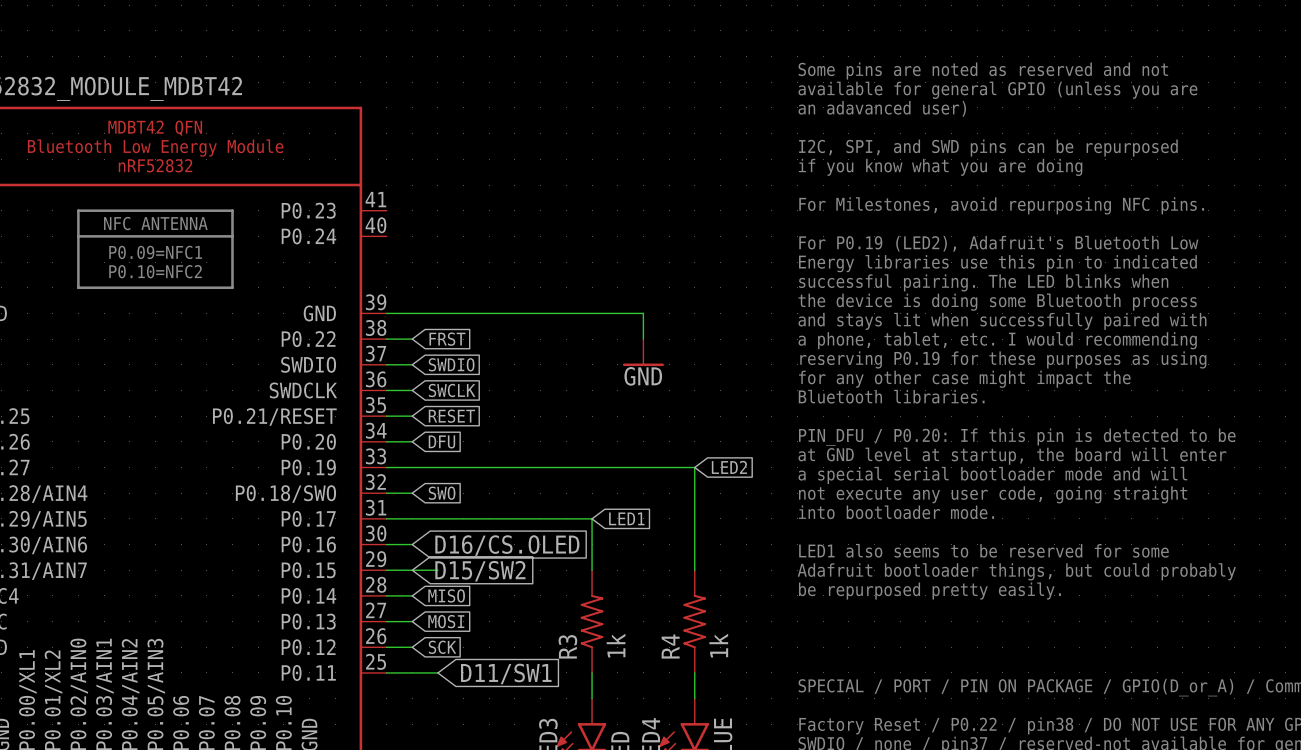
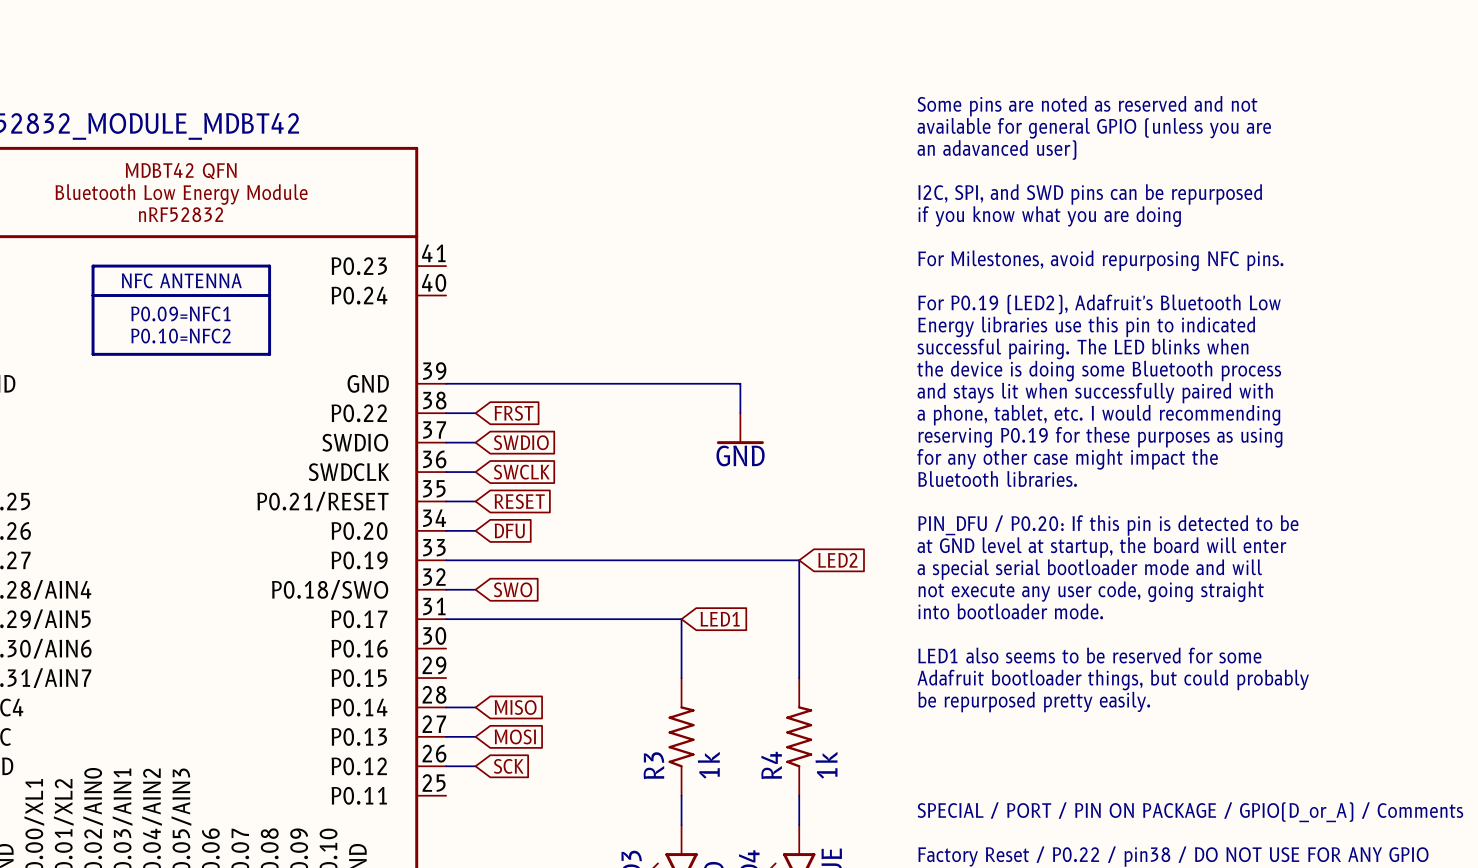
wire: (386, 544) (412, 544) -> none
global label: D16/CS.OLED (507, 545) -> none
wire: (386, 570) (437, 570) -> none
global label: D15/SW2 (480, 571) -> none
wire: (386, 672) (437, 672) -> none
global label: D11/SW1 (506, 673) -> none

